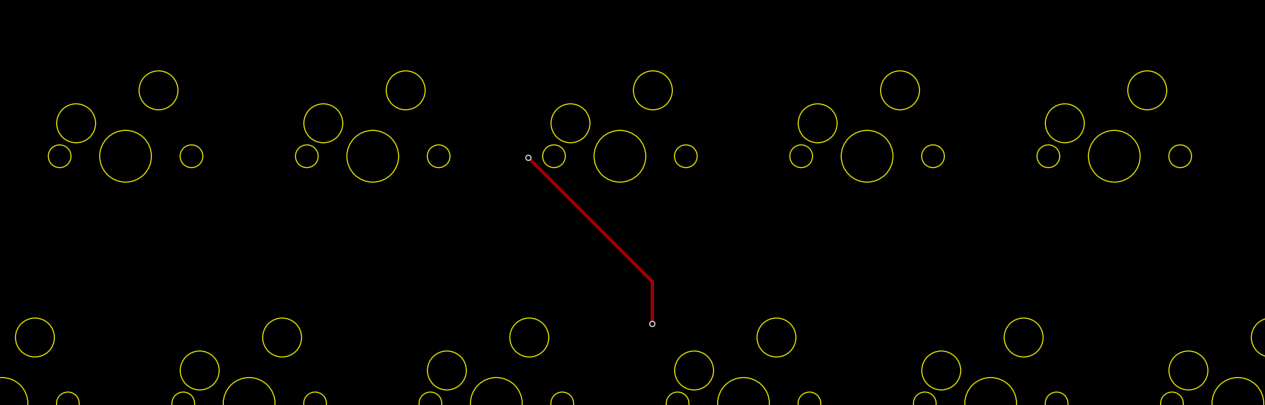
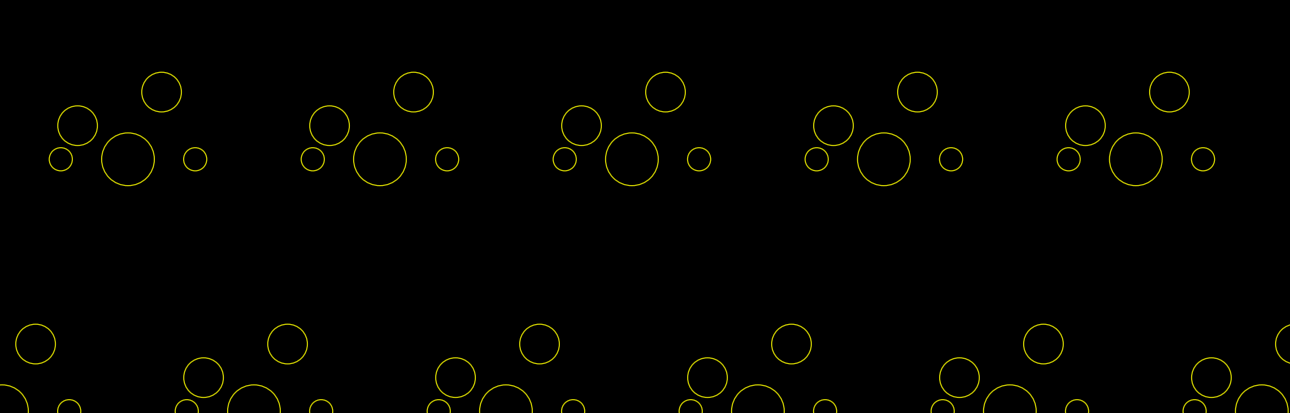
track: (528, 157) (652, 281) (652, 323) -> none
via: (528, 157) -> none
via: (652, 323) -> none

